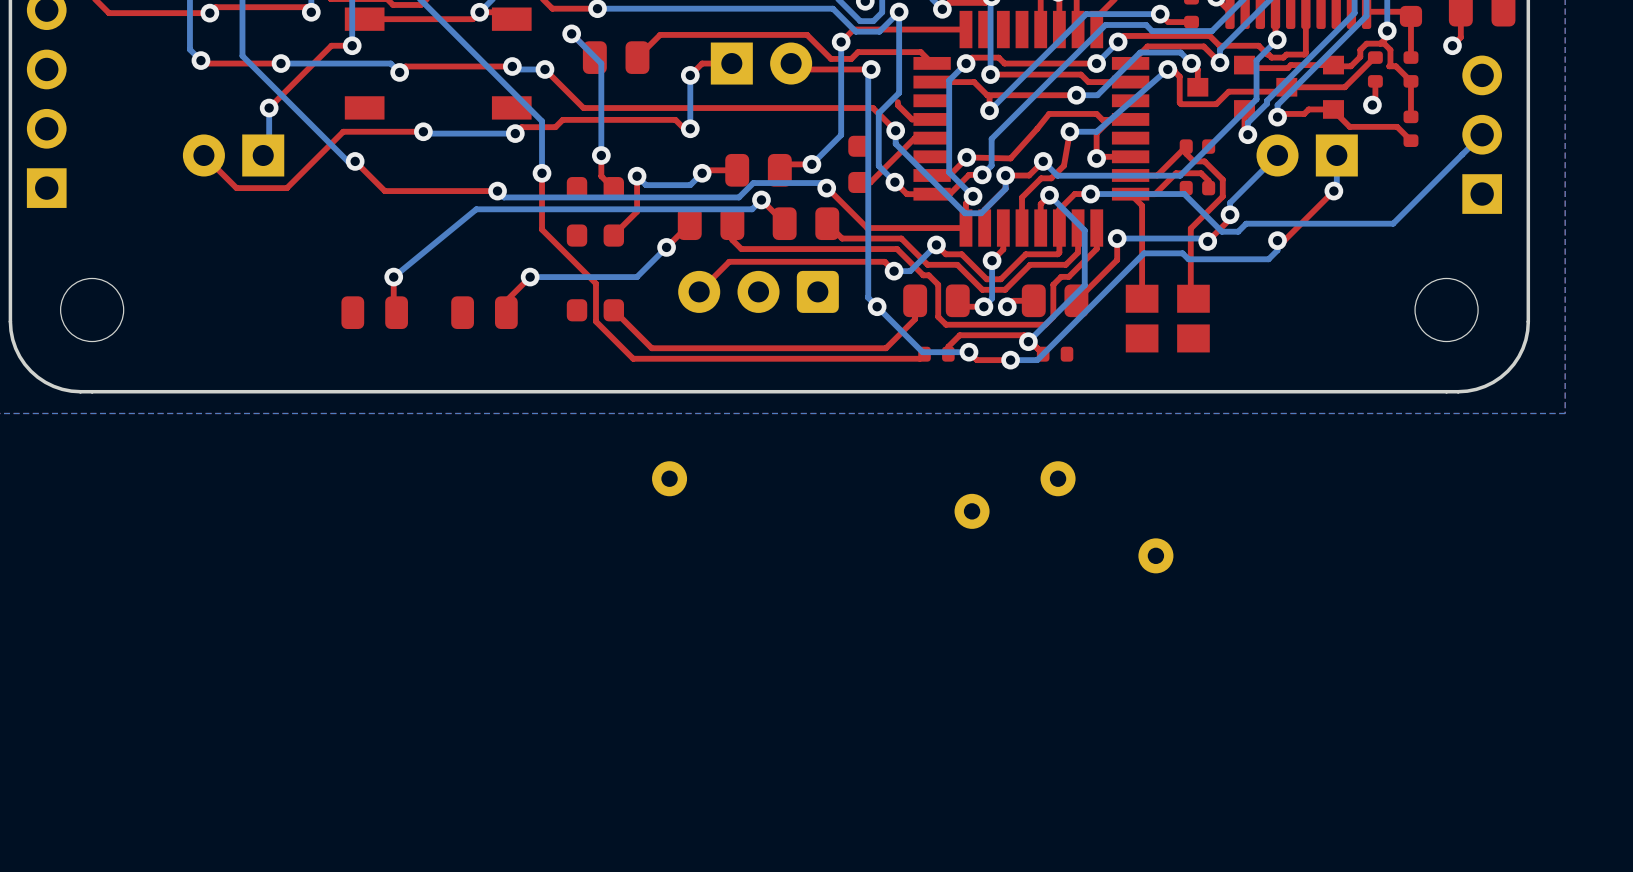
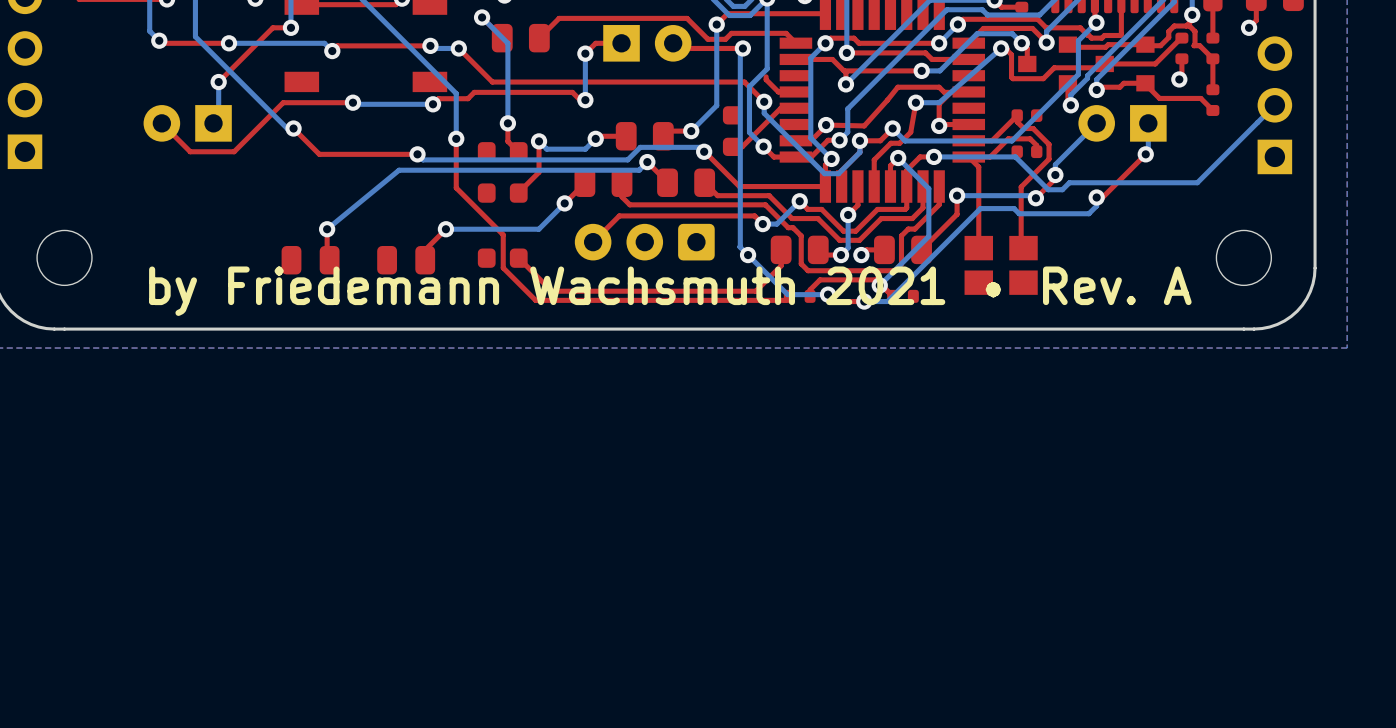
text: none -> by Friedemann Wachsmuth 2021 • Rev. A (670, 291)
part: (669, 478) -> none
part: (1058, 478) -> none
part: (972, 511) -> none
part: (1155, 555) -> none

